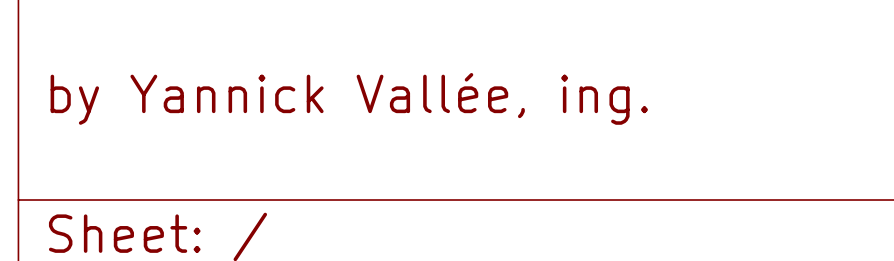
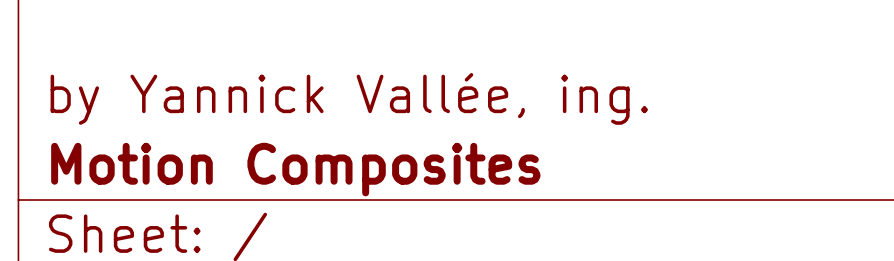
title block: none -> Motion Composites (295, 169)

